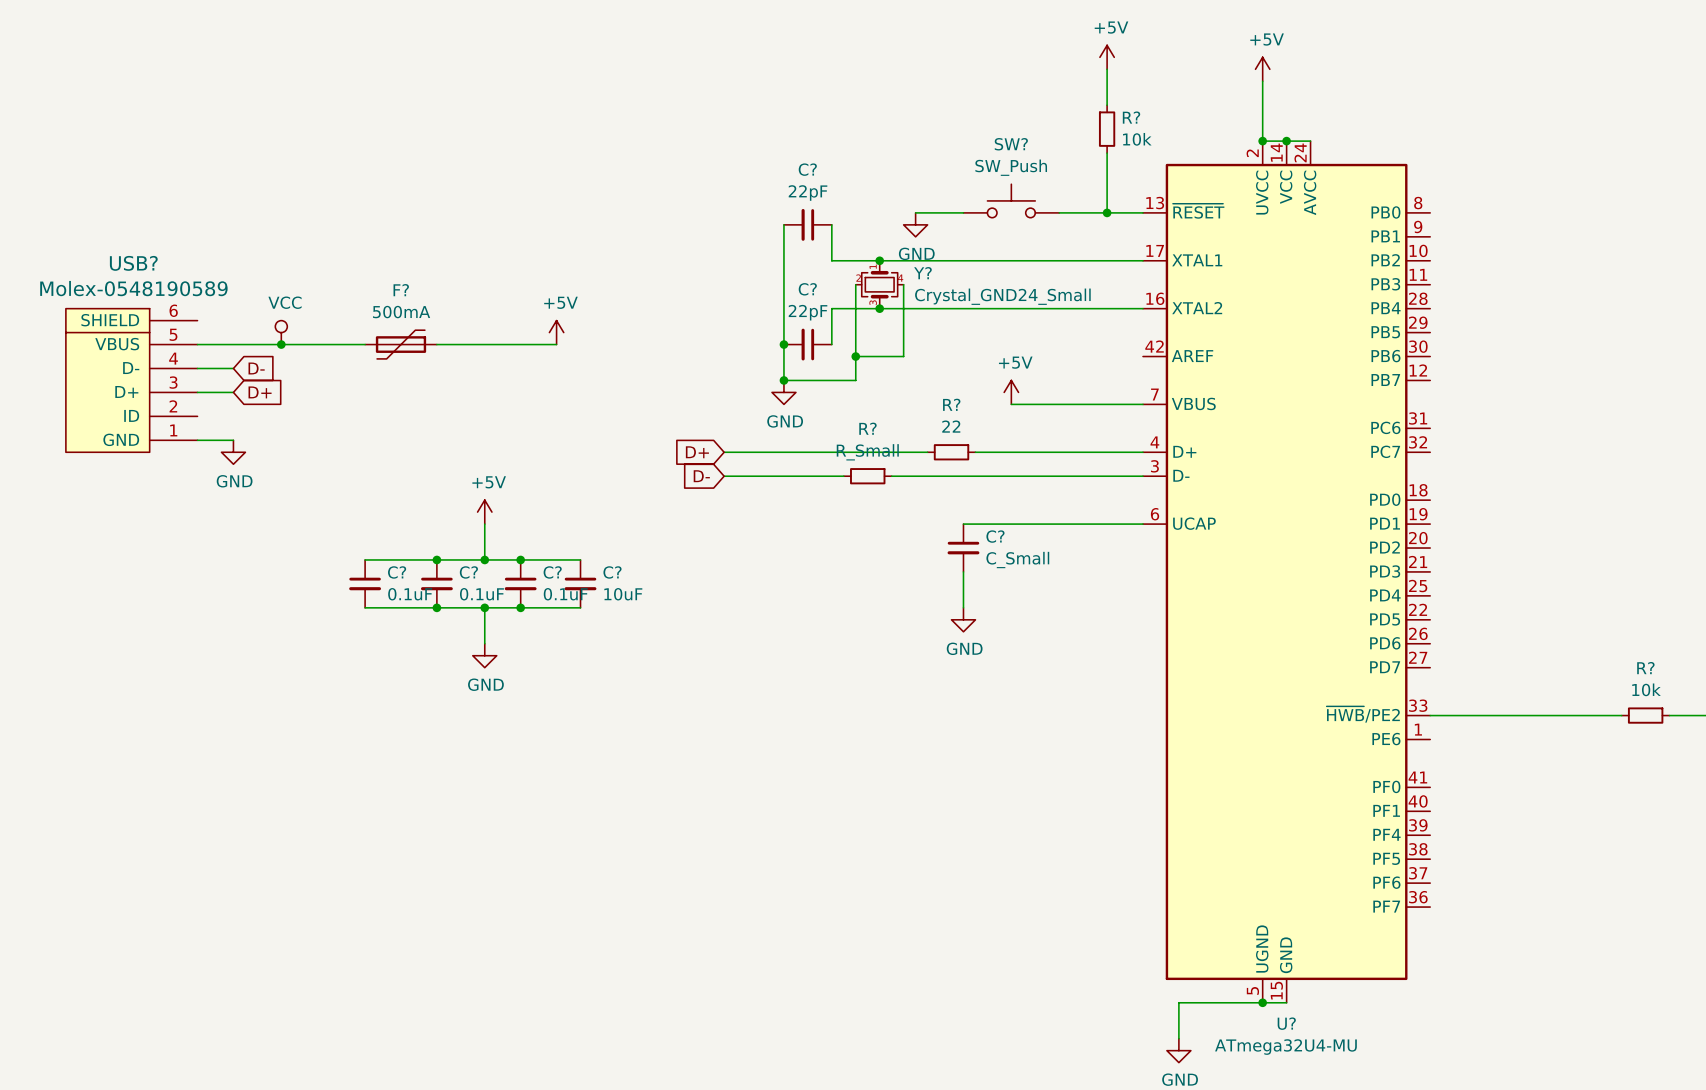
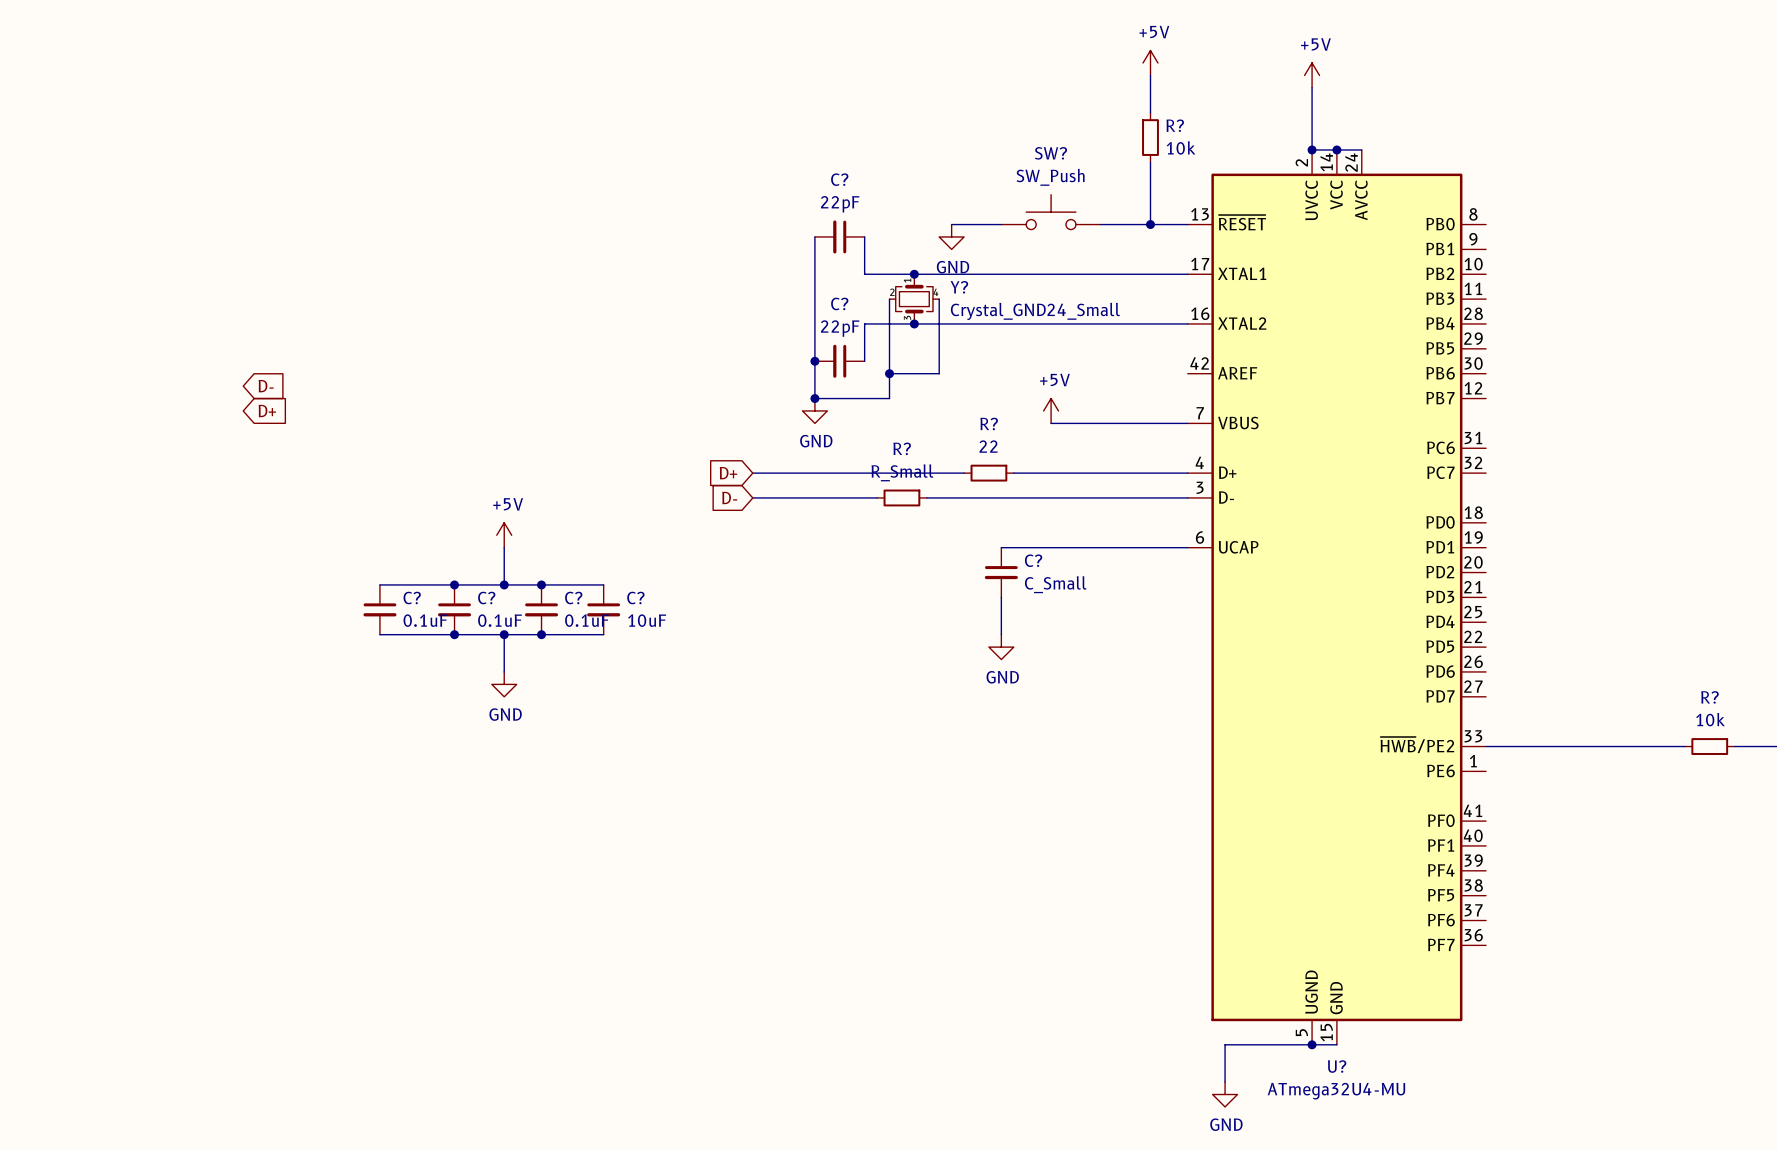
power symbol: VCC (281, 332) -> none
power symbol: +5V (556, 332) -> none
wire: (197, 344) (365, 344) -> none
junction: (281, 344) -> none
F?: 500mA (400, 344) -> none
wire: (436, 344) (556, 344) -> none
wire: (197, 368) (233, 368) -> none
USB?: Molex-0548190589 (131, 380) -> none
wire: (197, 392) (233, 392) -> none
wire: (197, 440) (233, 440) -> none
power symbol: GND (233, 452) -> none

